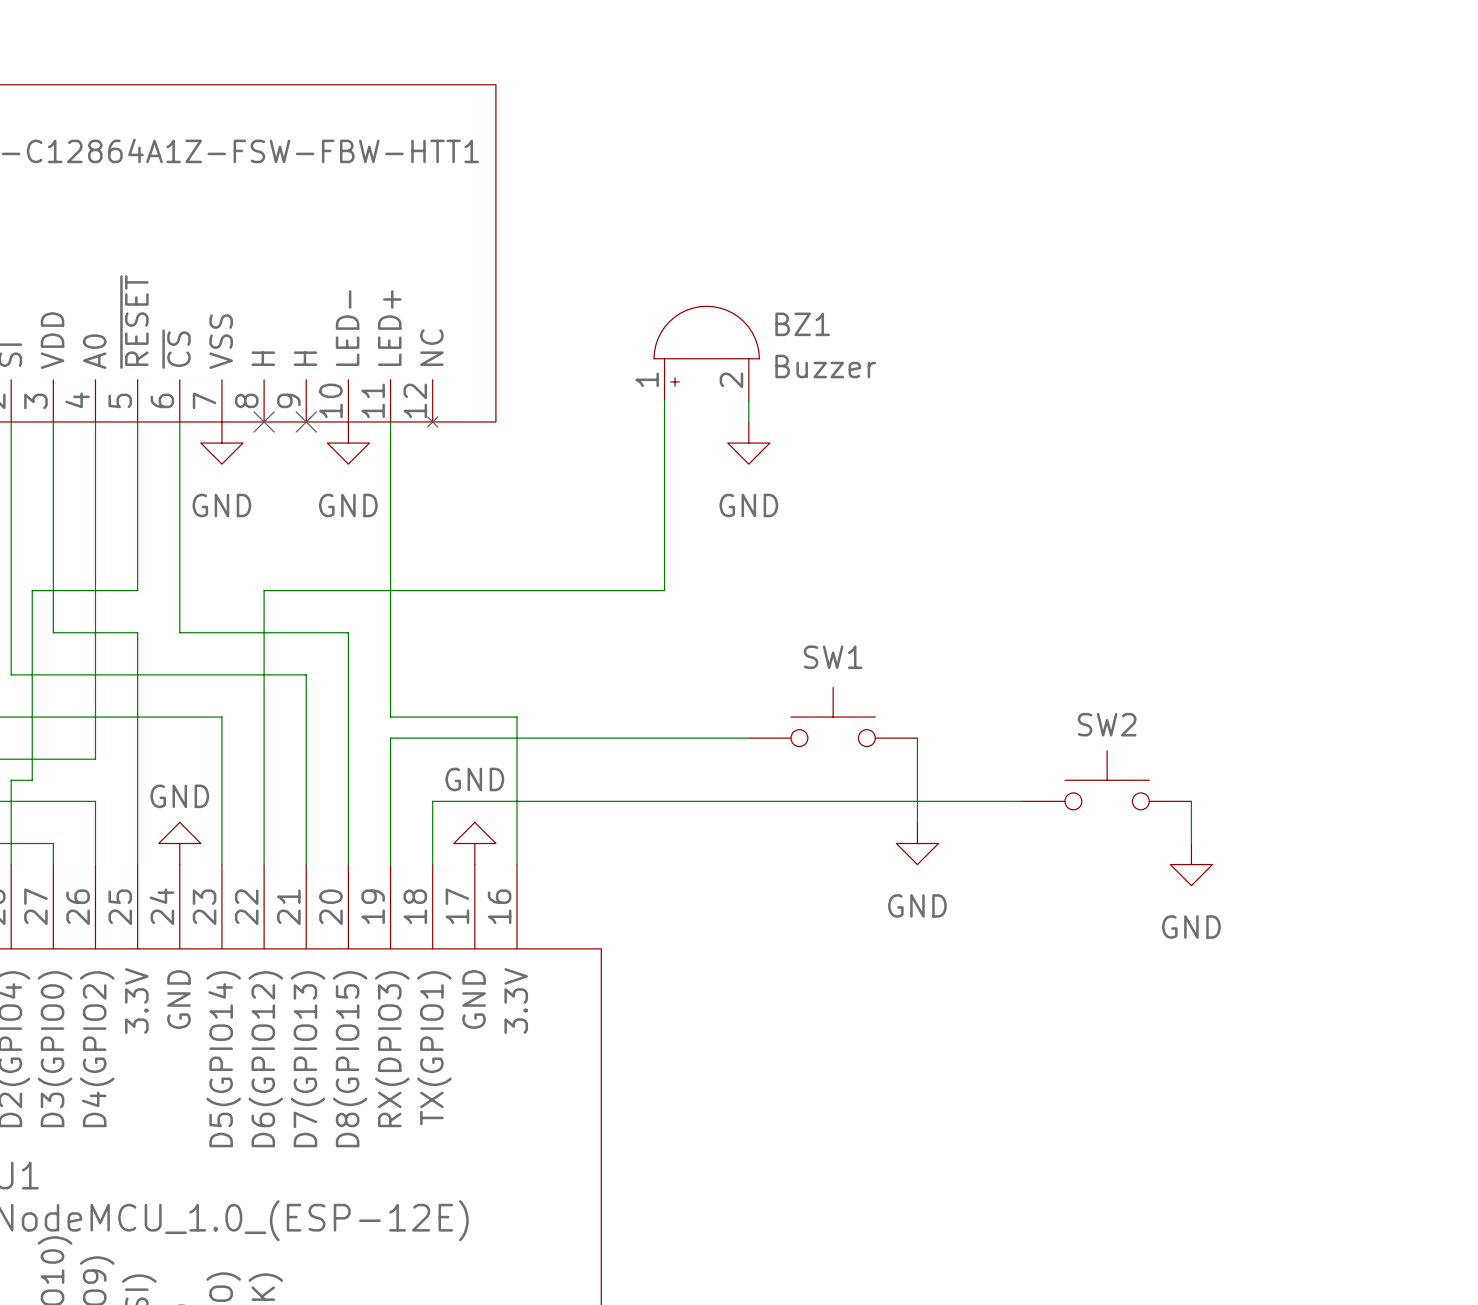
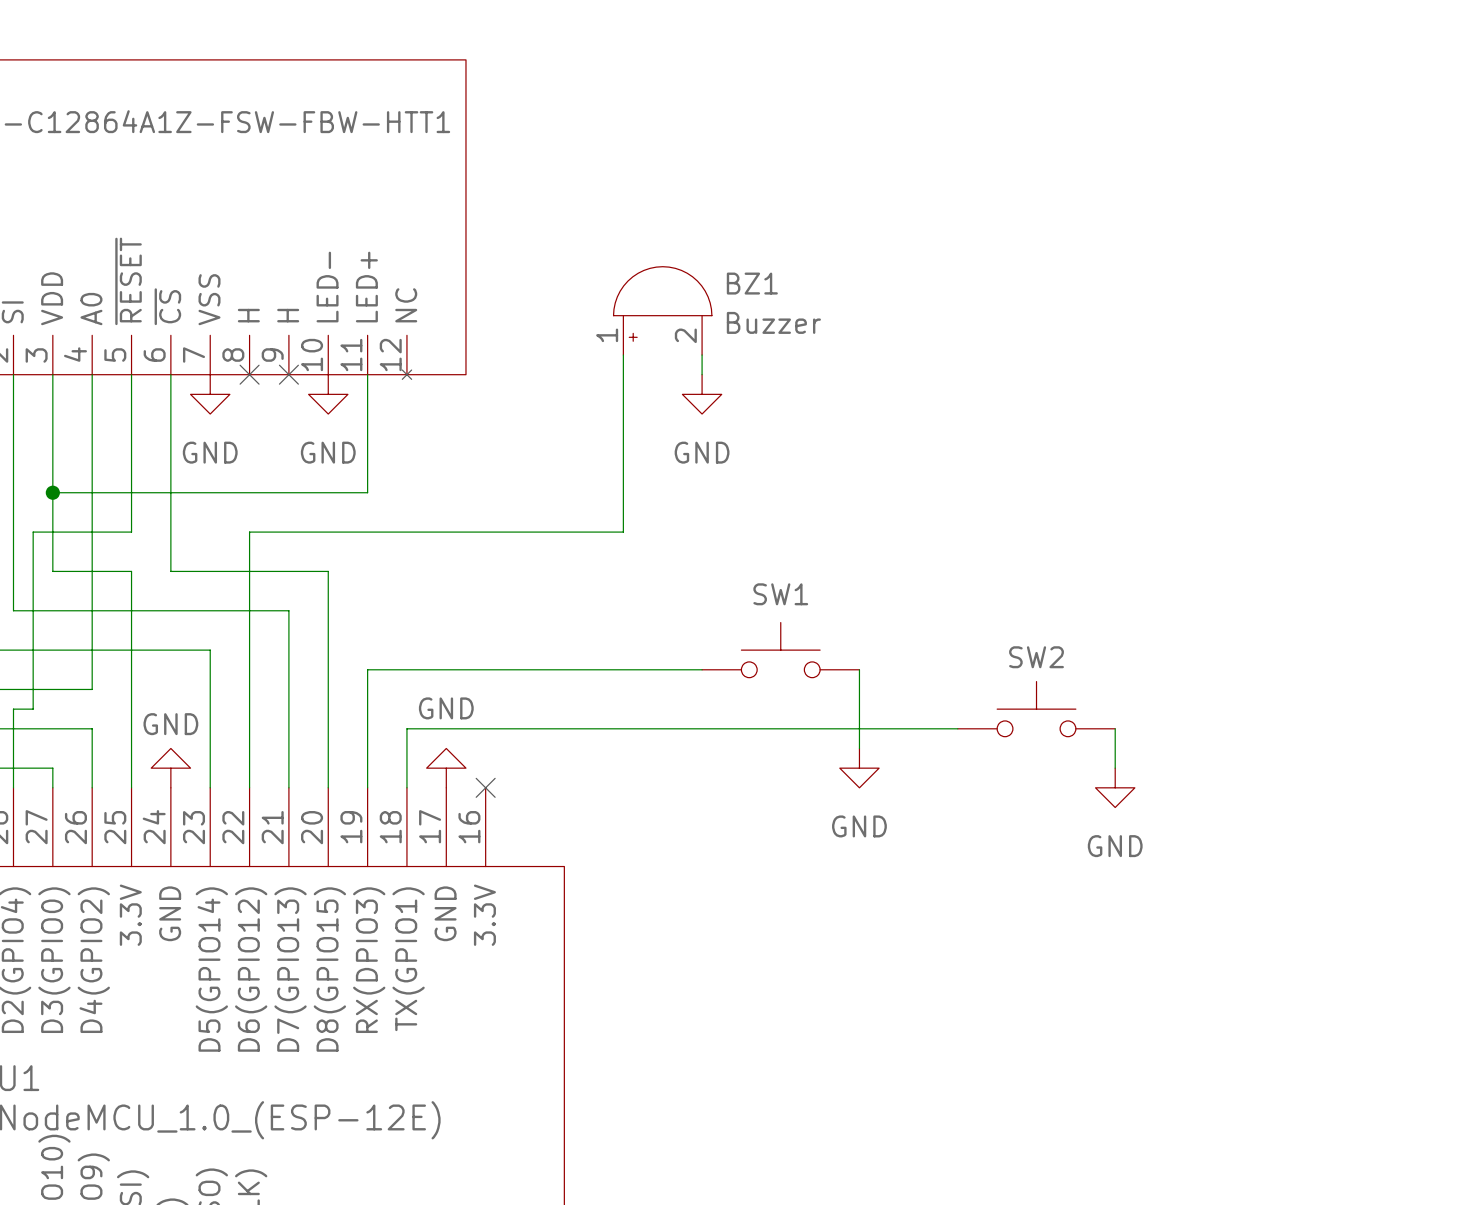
junction: none -> (52, 492)
wire: (390, 548) (390, 717) (517, 717) (517, 864) -> (367, 492) (52, 492)
no-connect mark: none -> (485, 787)

